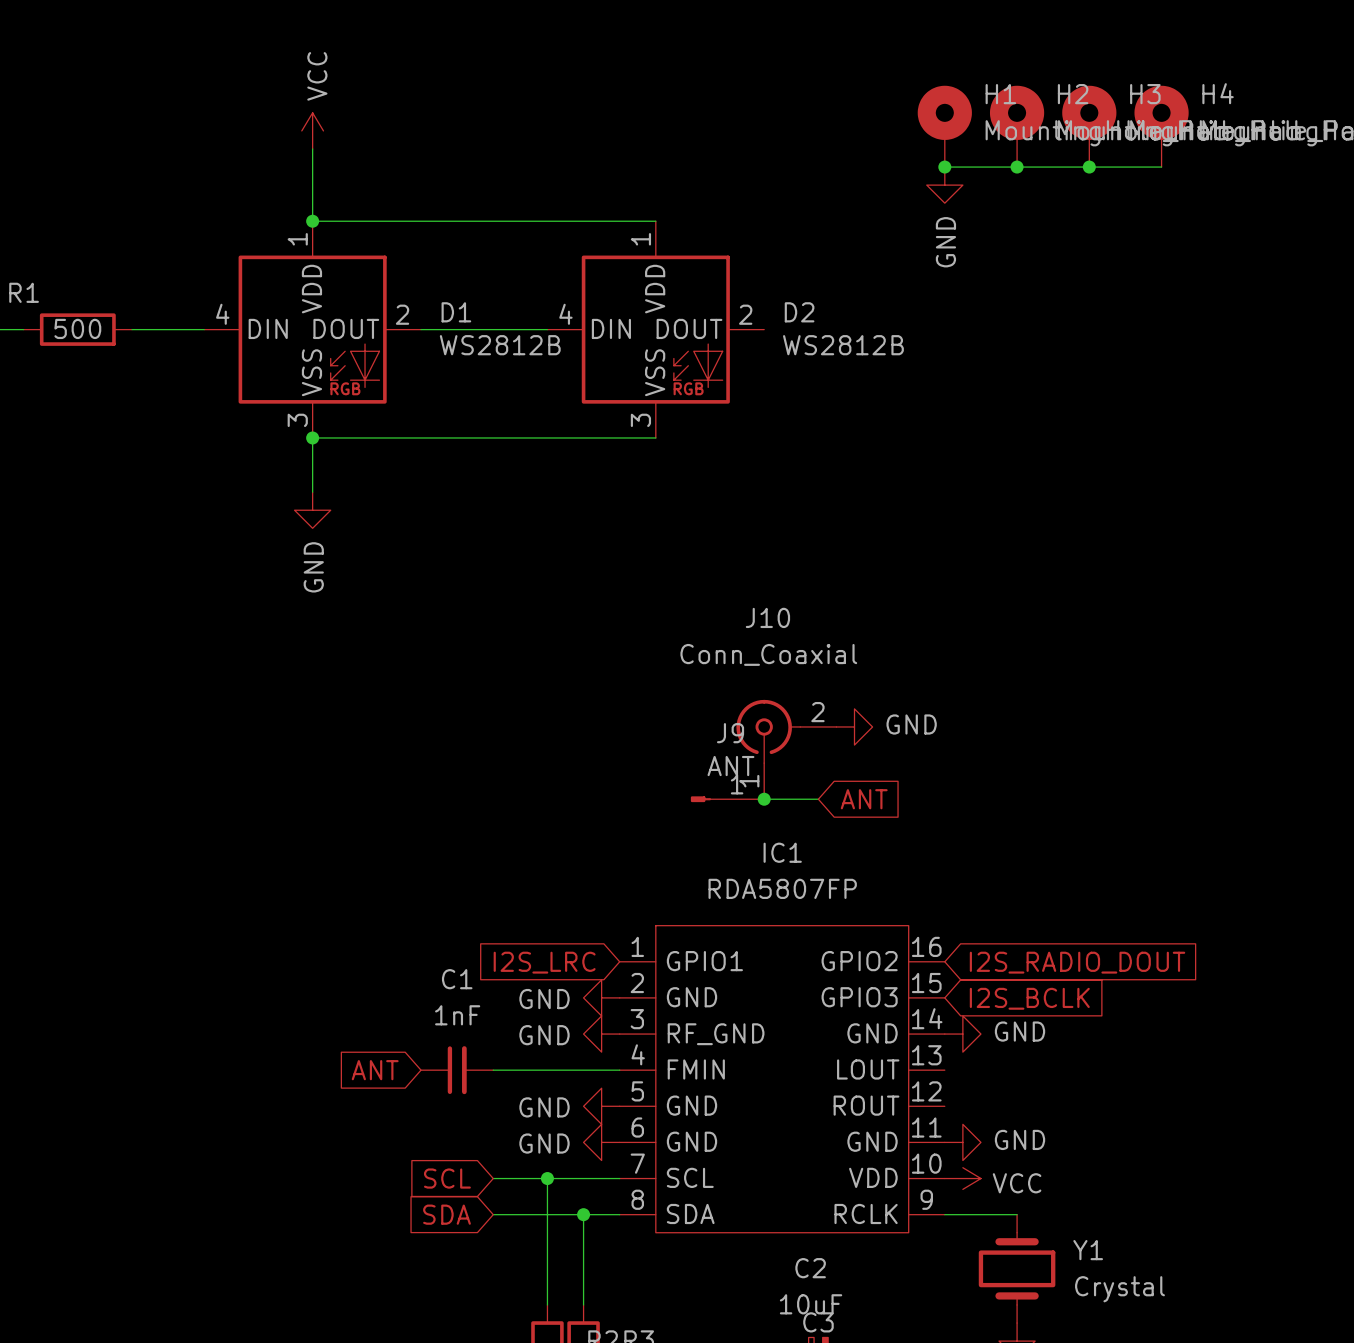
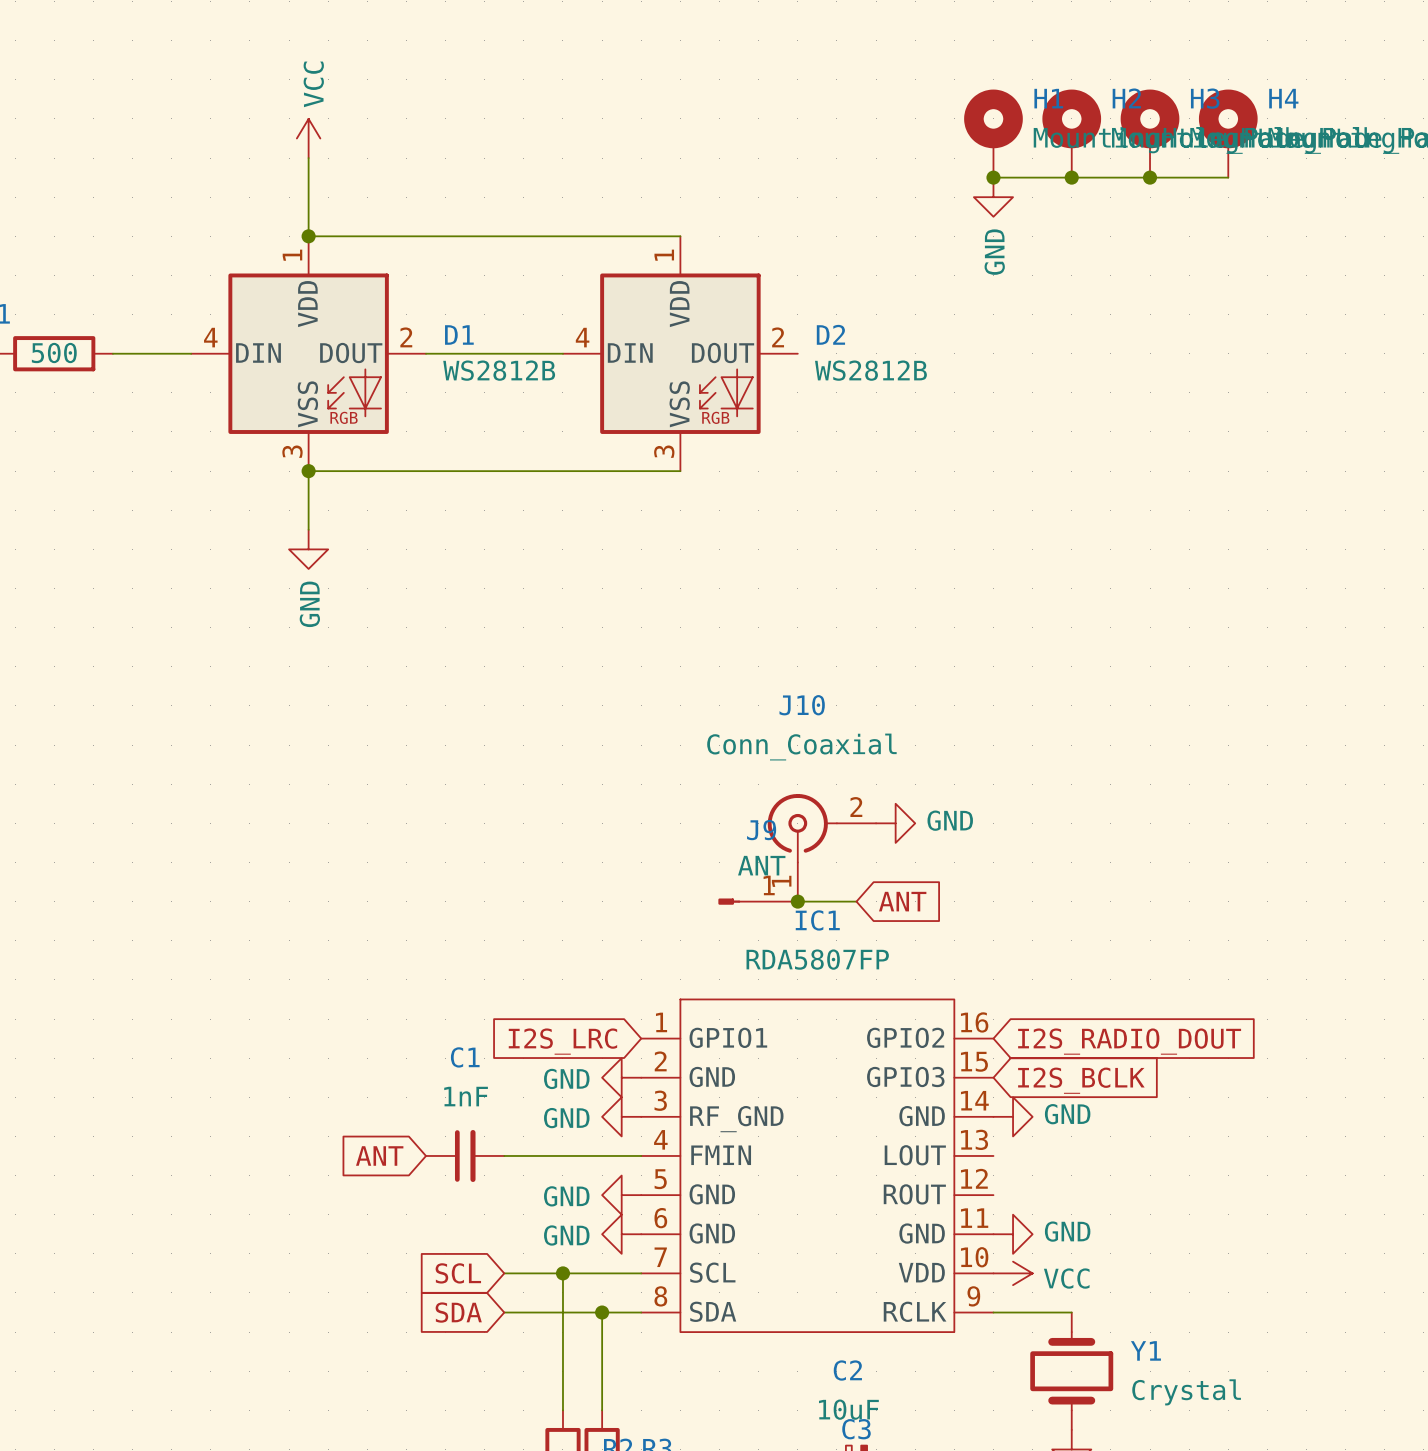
power symbol position: GND (854, 726) -> GND (895, 823)
J10 position: (786, 749) -> (821, 847)
J9 position: (727, 799) -> (758, 901)
wire: (764, 799) (818, 799) -> (797, 901) (856, 901)
junction position: (764, 799) -> (797, 901)
global label position: ANT (864, 799) -> ANT (902, 901)

